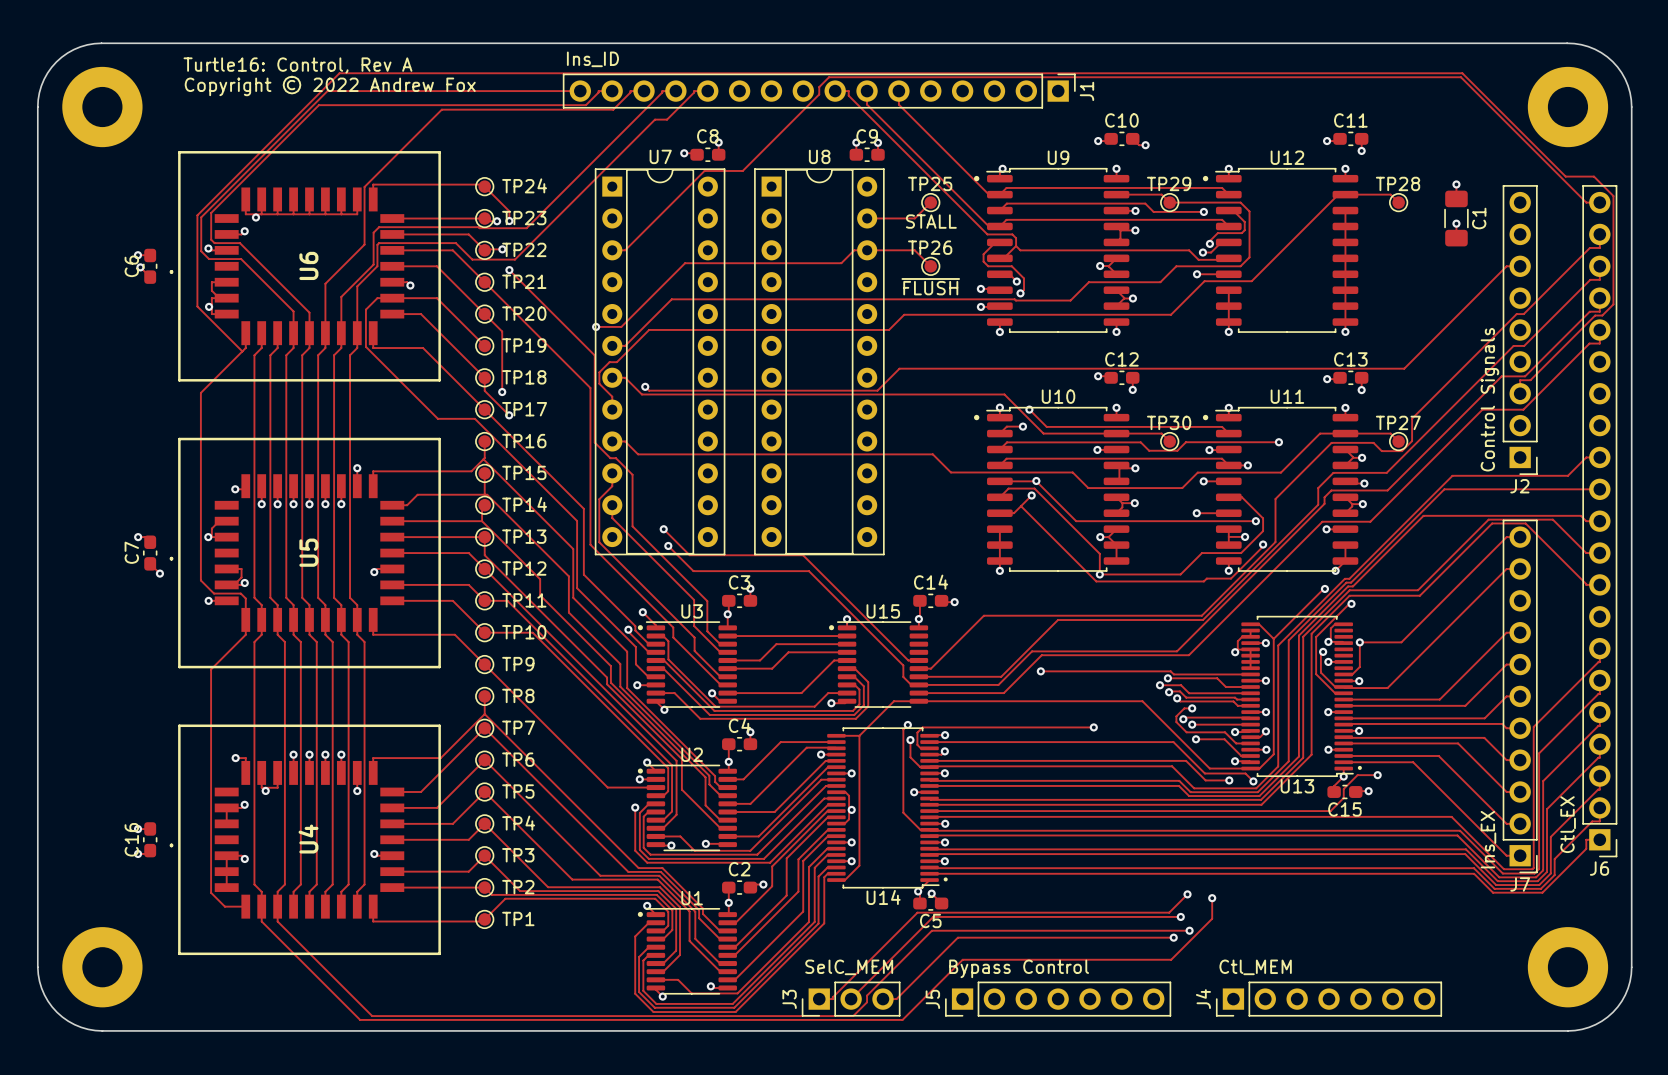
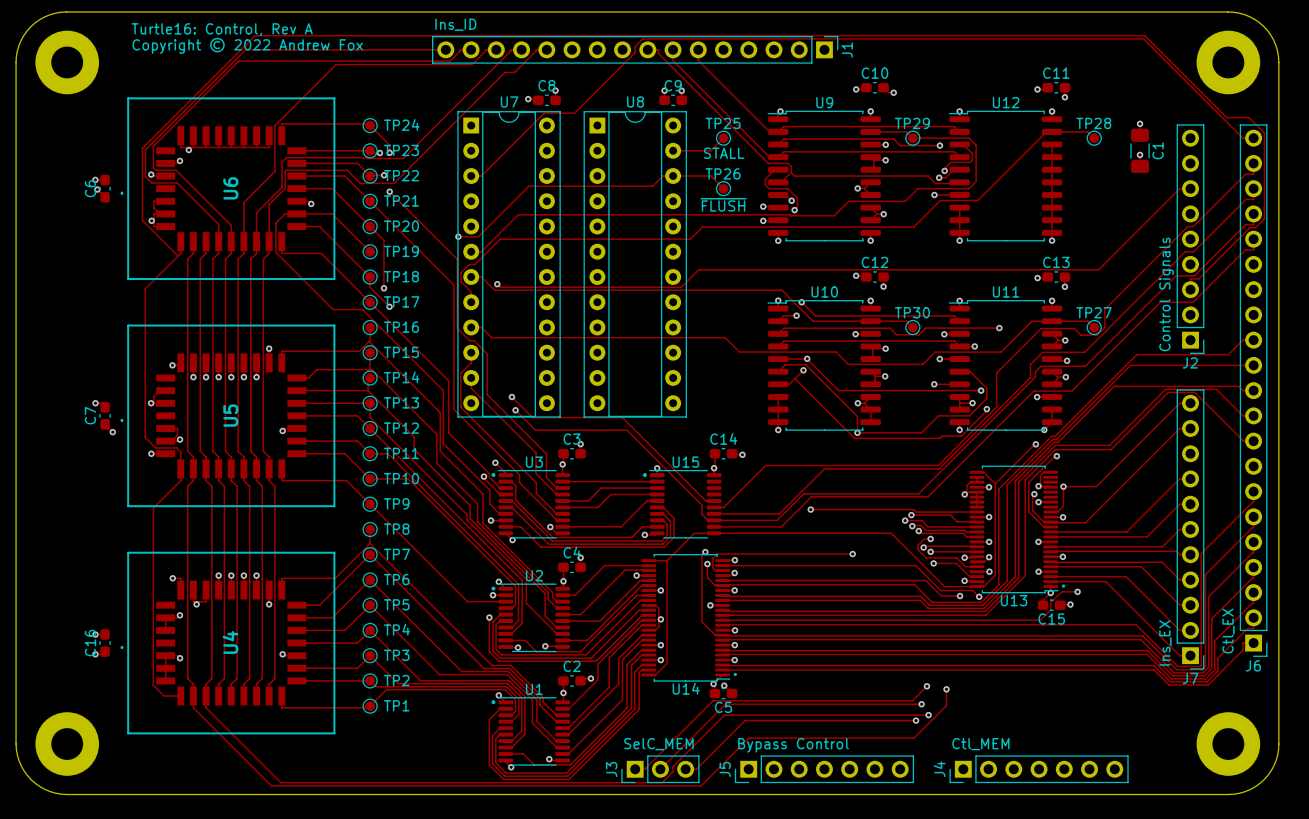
U9 footprint: [974, 167, 1130, 333] -> [767, 110, 881, 242]
U12 footprint: [1202, 167, 1359, 333] -> [948, 110, 1063, 242]
U10 footprint: [974, 406, 1130, 572] -> [767, 300, 881, 431]
U11 footprint: [1202, 406, 1359, 572] -> [948, 300, 1063, 431]

